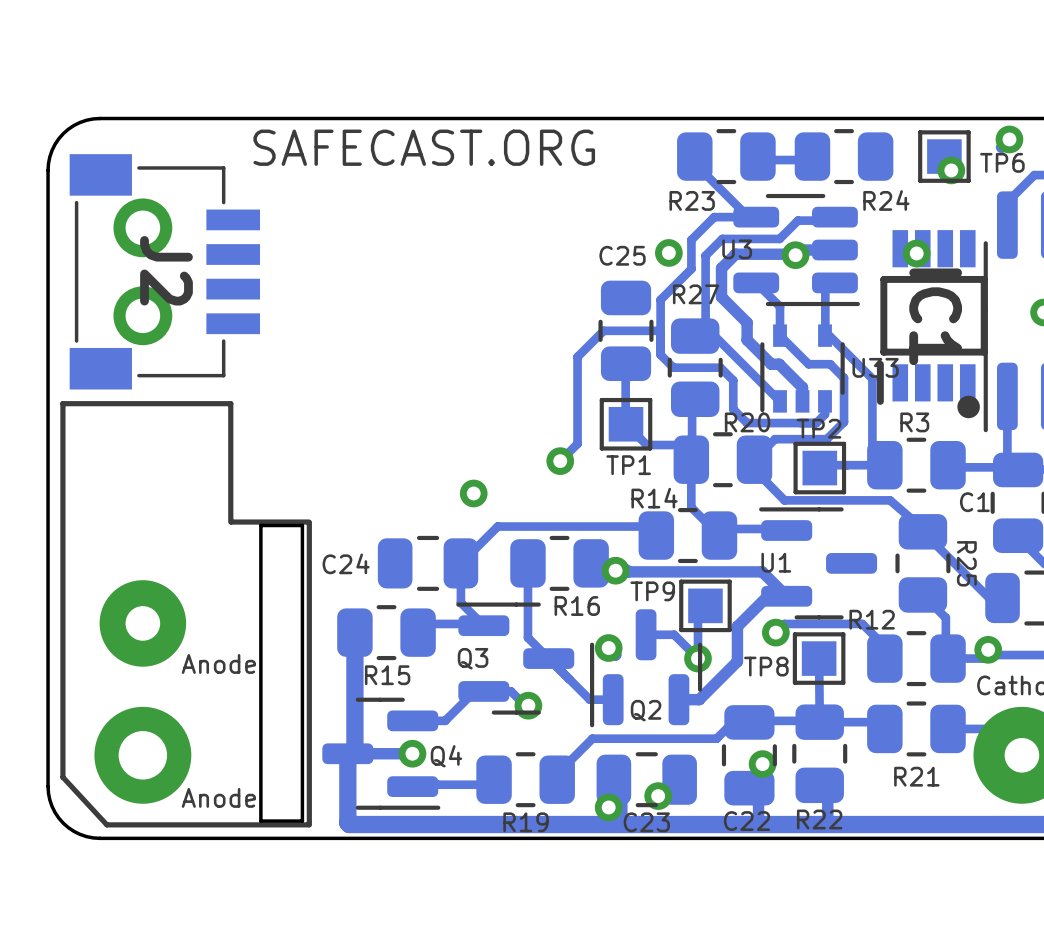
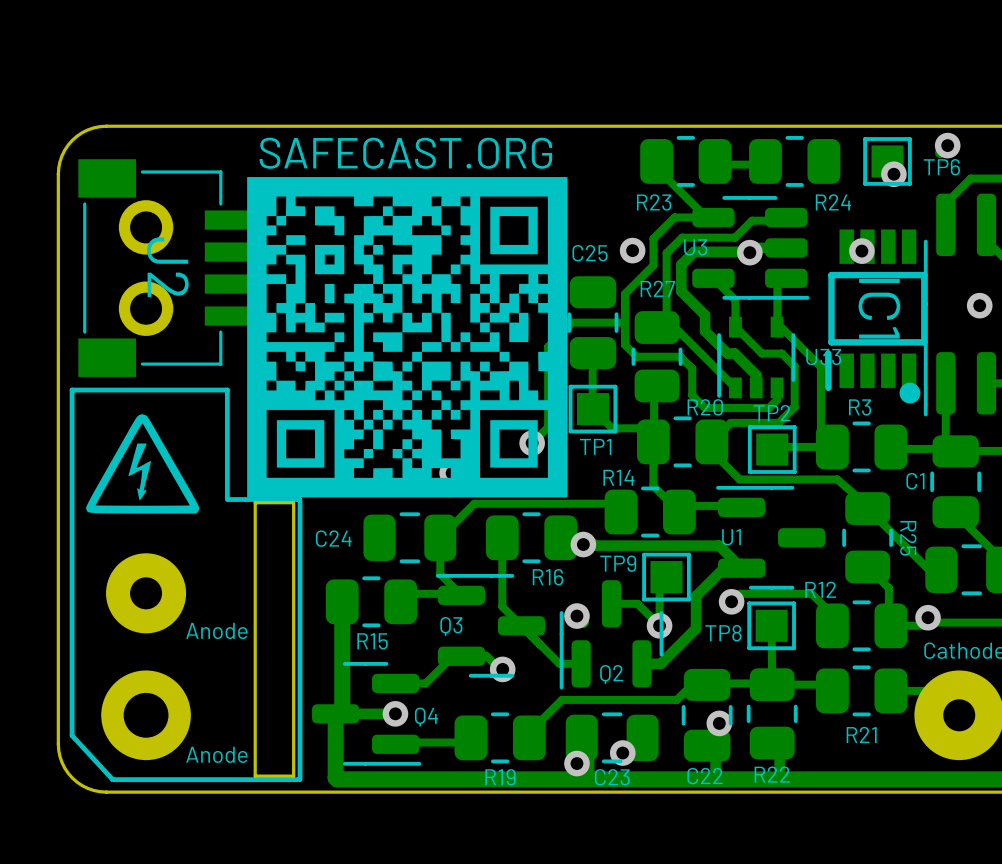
drawing: none -> [247, 177, 568, 498]
drawing: none -> [86, 414, 200, 514]

